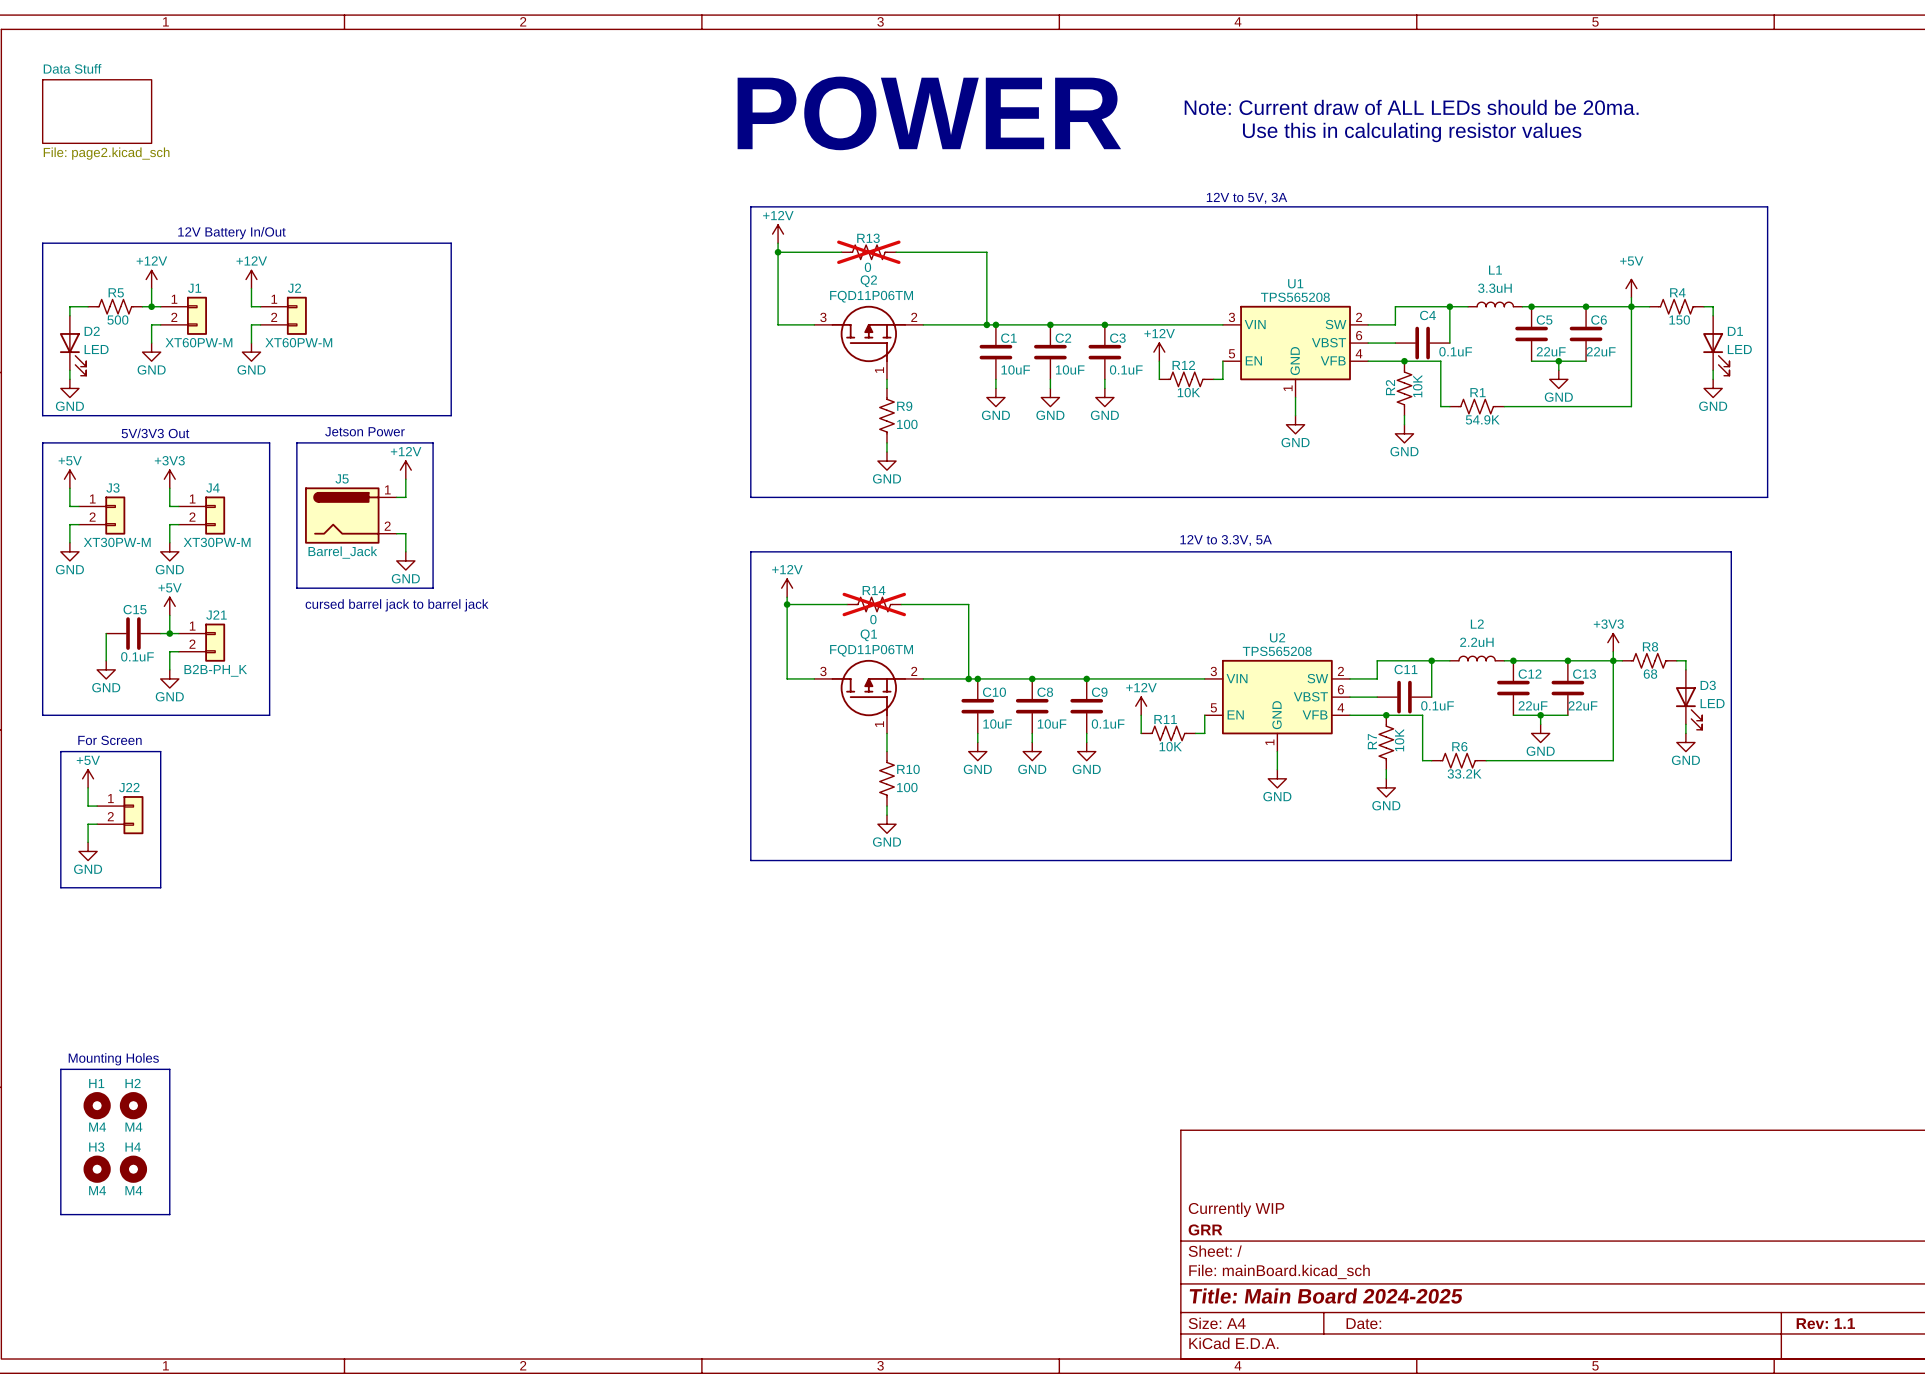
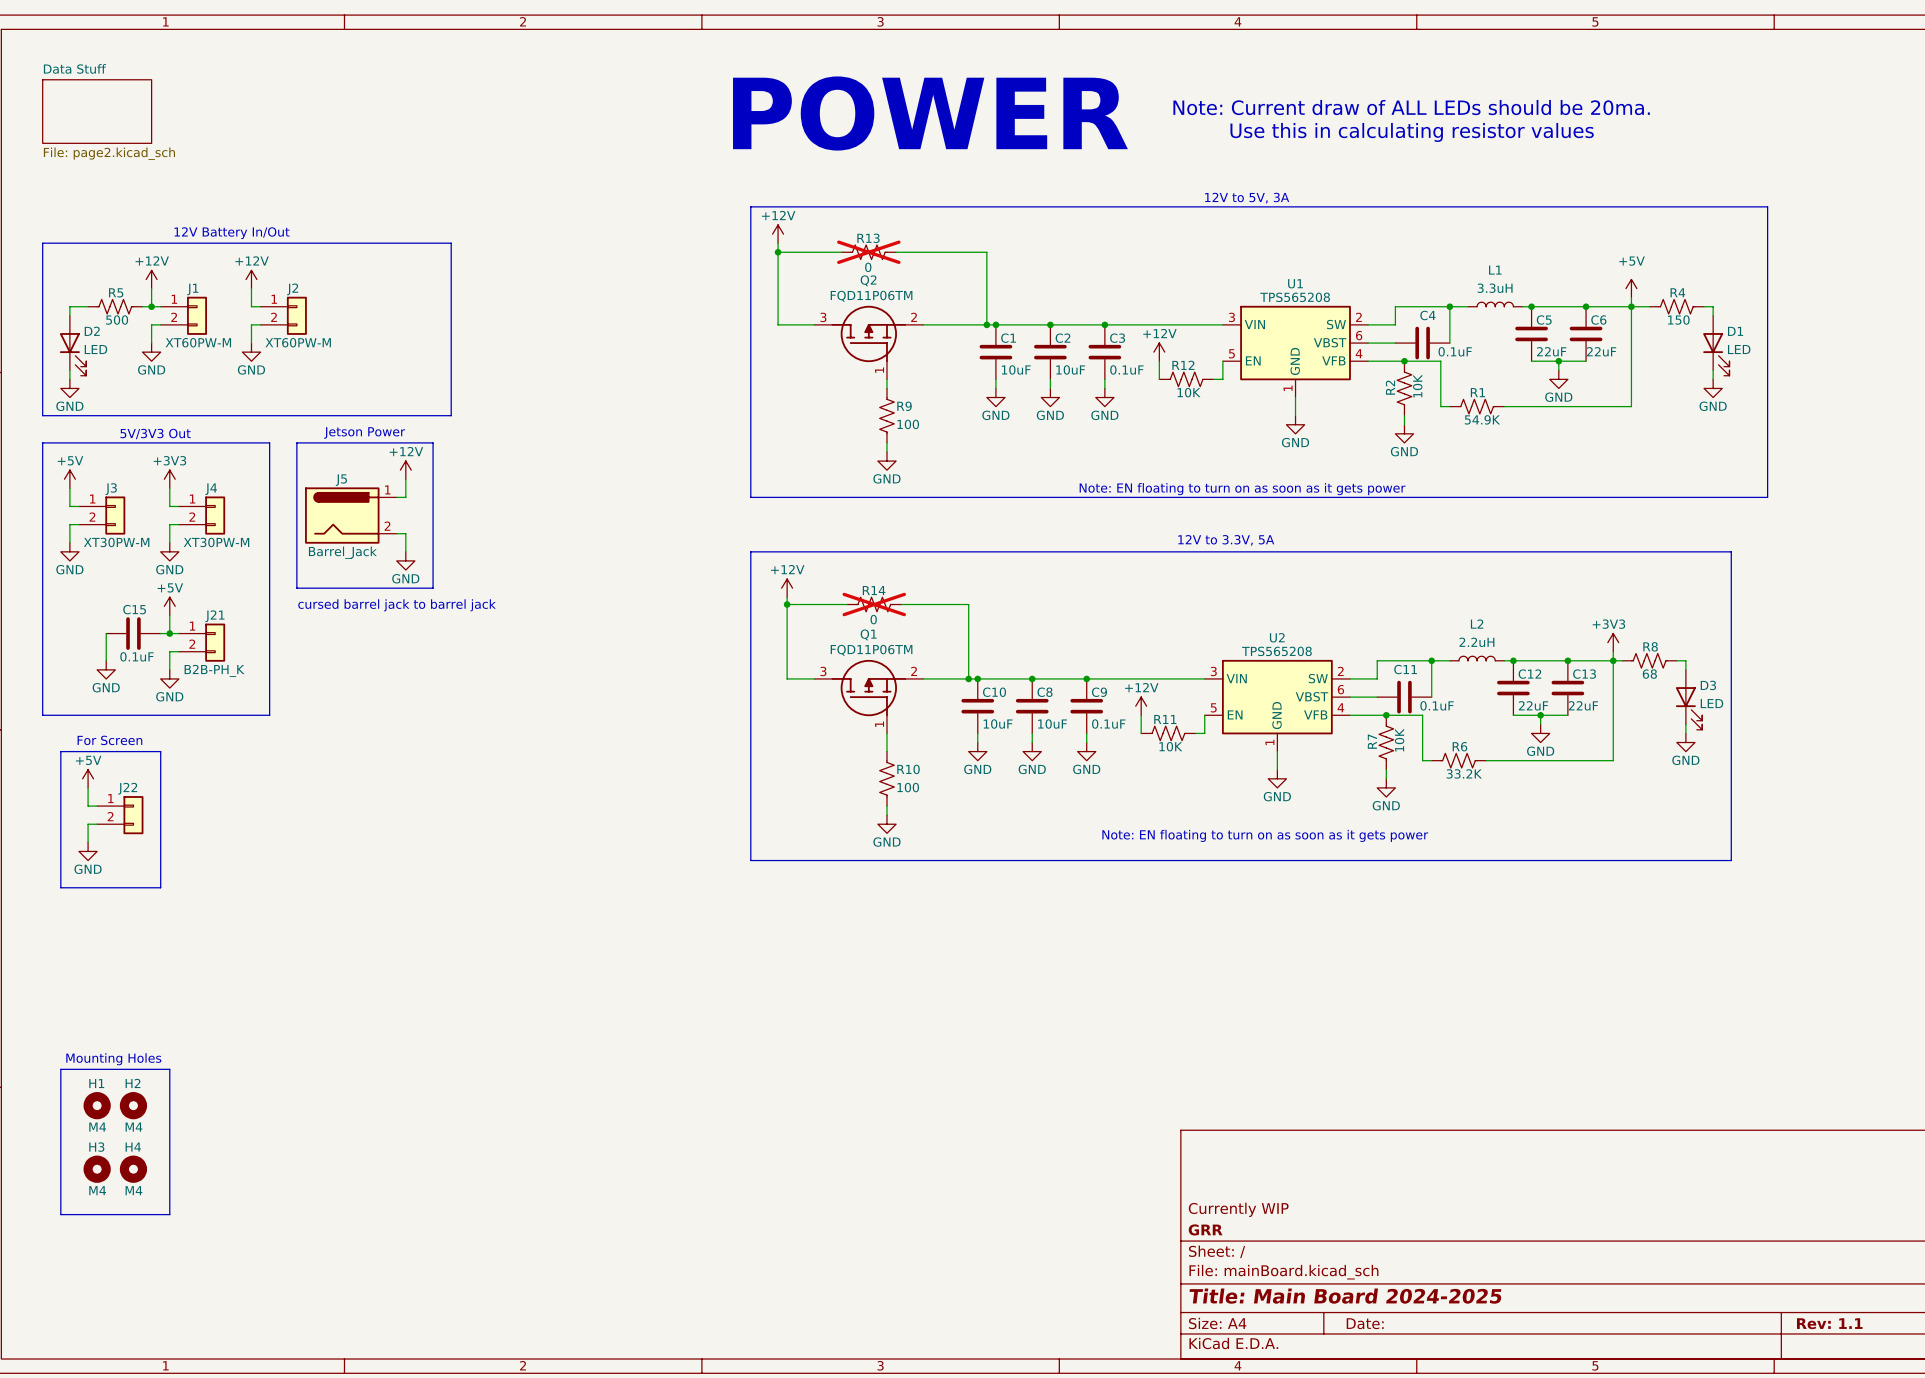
text: none -> Note: EN floating to turn on as soon as it gets power (1242, 489)
text: none -> Note: EN floating to turn on as soon as it gets power (1265, 835)

